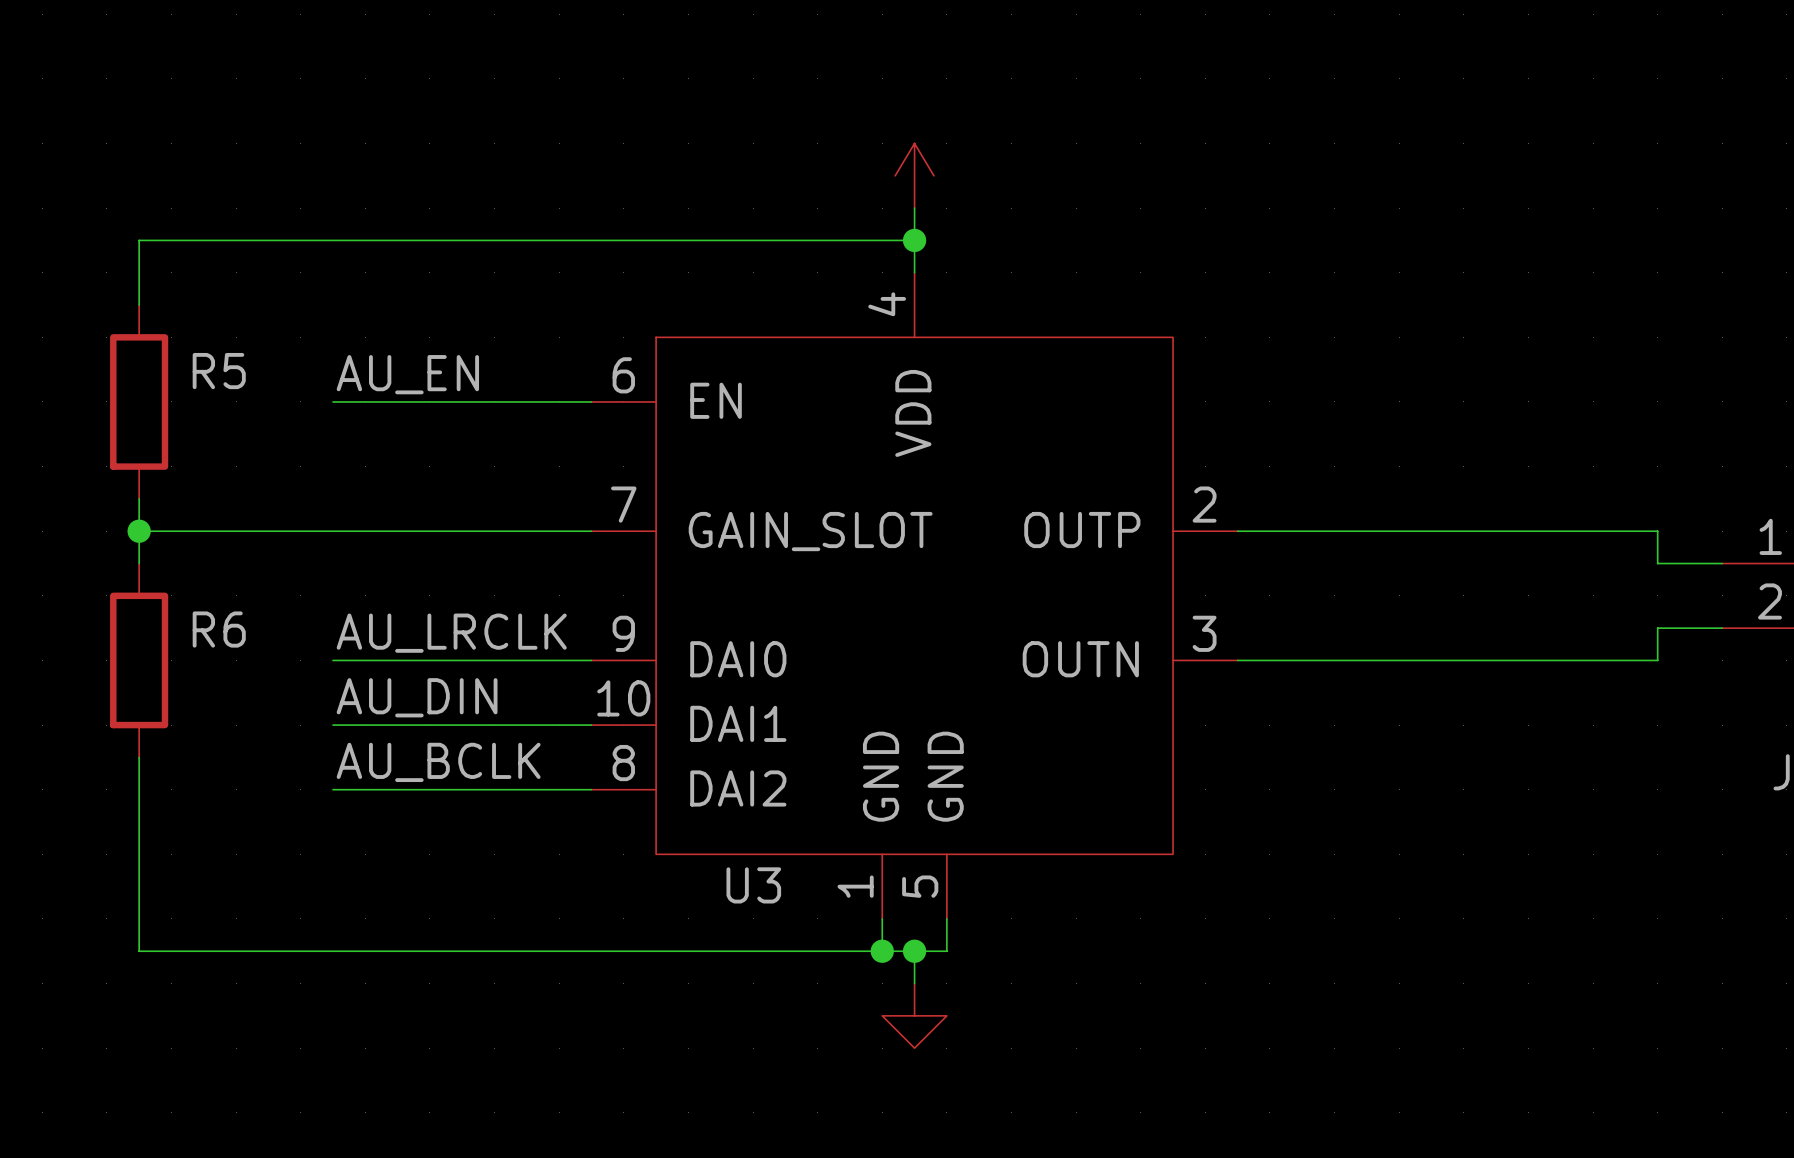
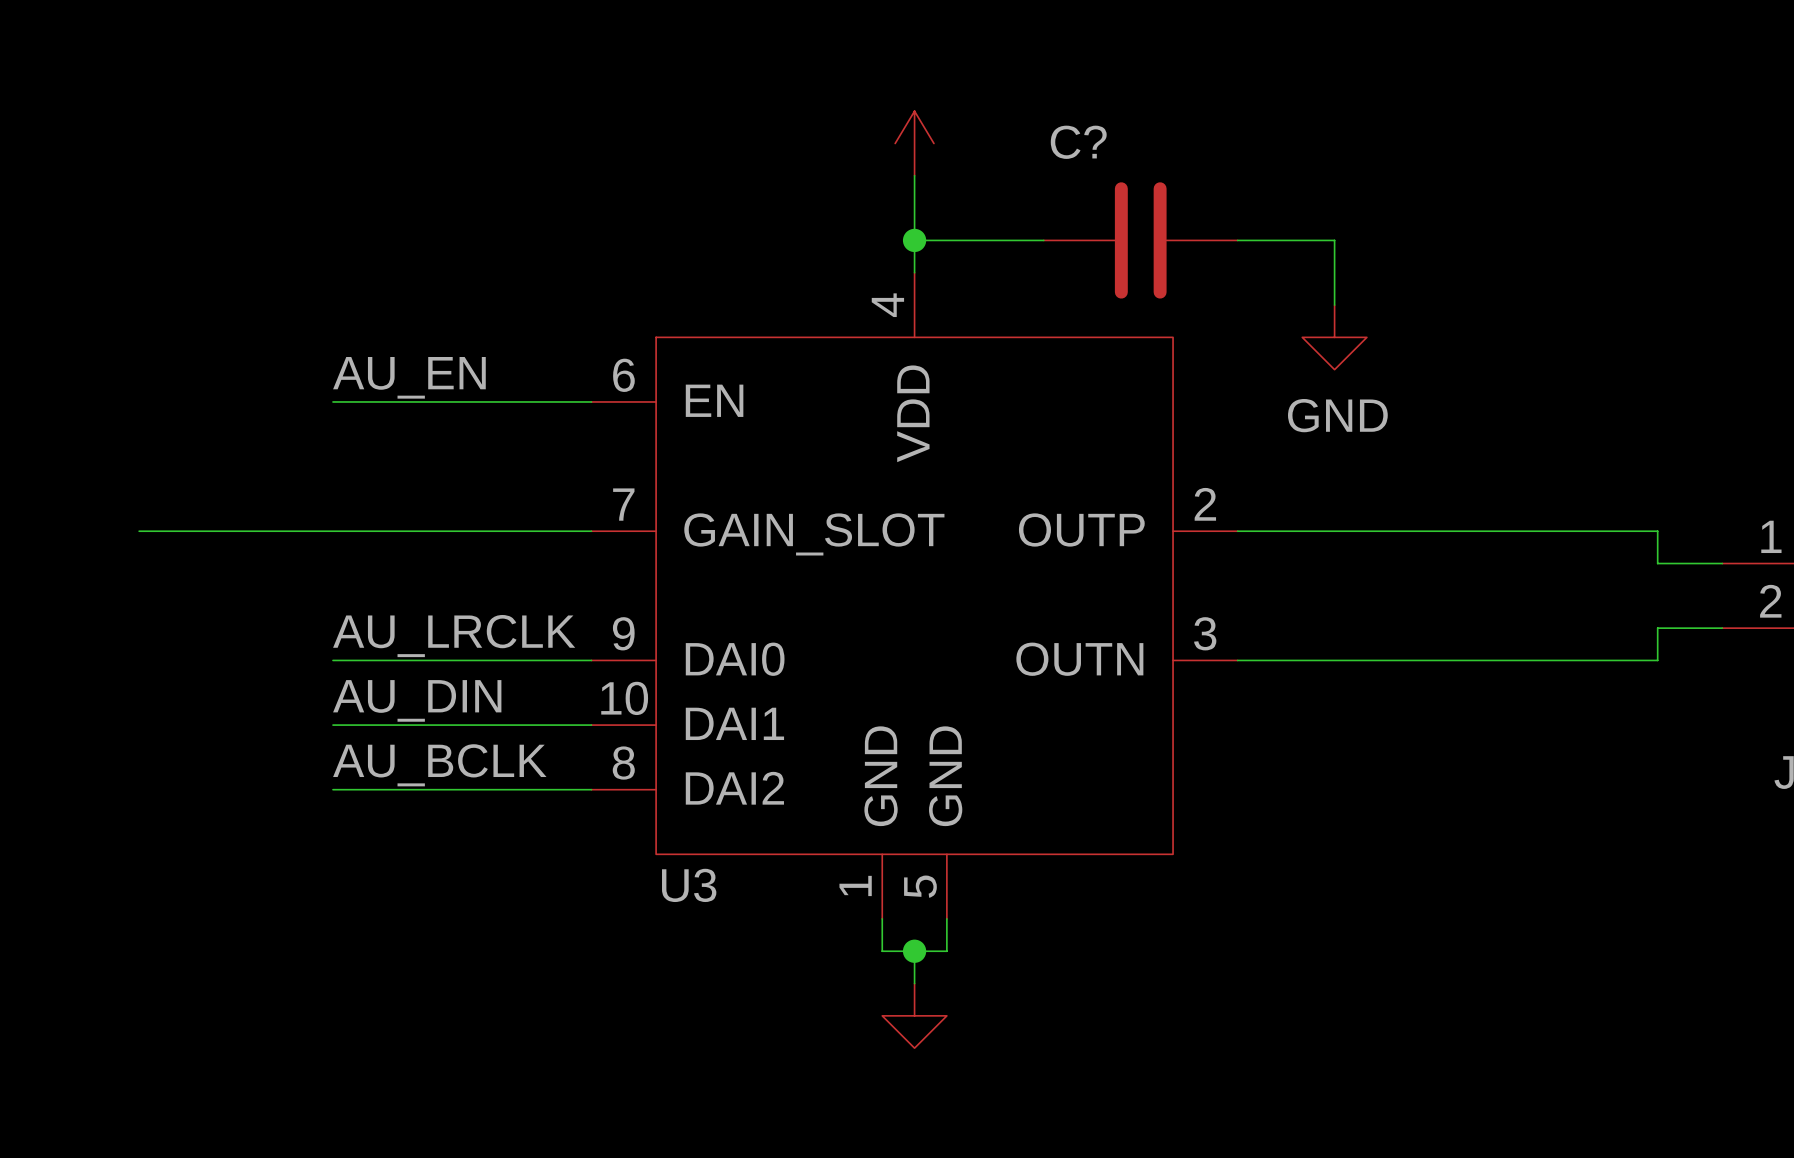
power symbol position: (914, 175) -> (914, 143)
wire: (914, 240) (139, 240) (139, 305) -> (914, 240) (1043, 240)
C?: none -> (1140, 240)
wire: none -> (1237, 240) (1334, 240) (1334, 305)
power symbol: none -> GND (1334, 337)
R5: (139, 401) -> none
wire: (139, 498) (139, 563) -> none
junction: (139, 531) -> none
R6: (139, 660) -> none
wire: (139, 757) (139, 951) (882, 951) -> none
U3 name position: U3 (753, 885) -> U3 (689, 885)
junction: (882, 951) -> none

